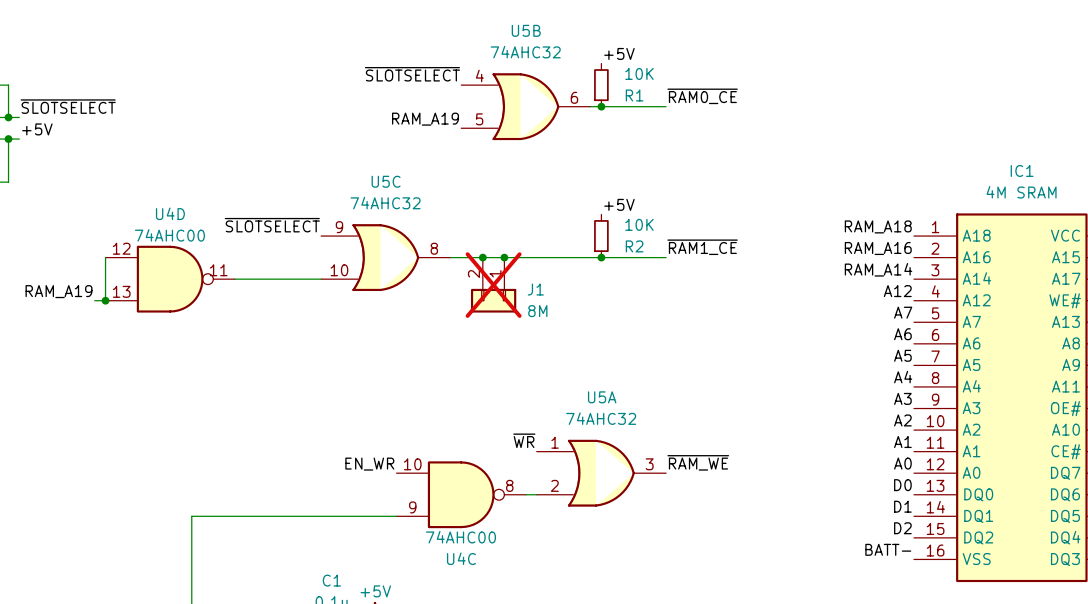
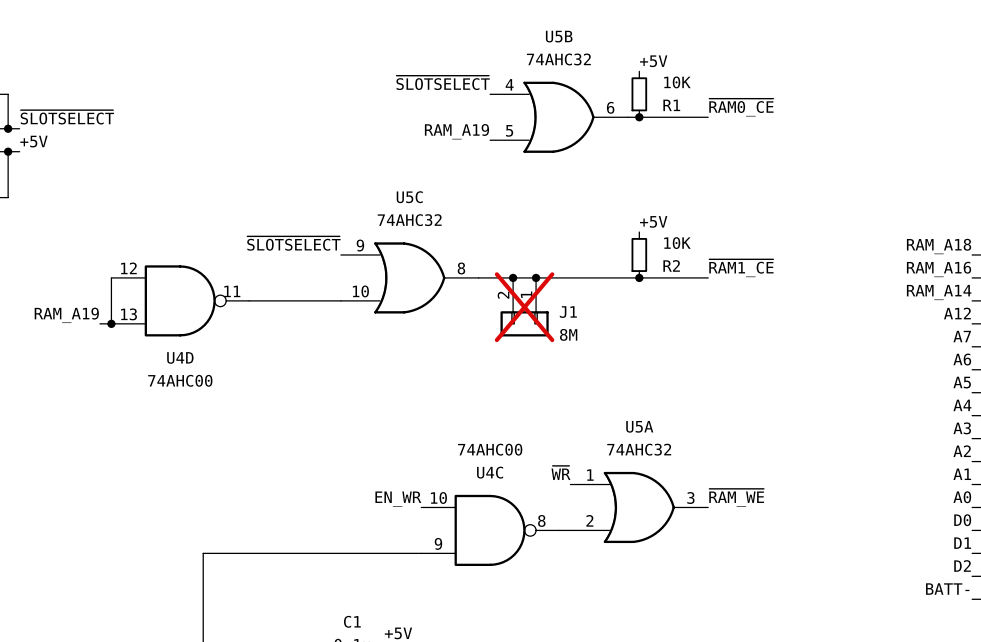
U4D name position: U4D (170, 213) -> U4D (180, 357)
U4D value position: 74AHC00 (169, 235) -> 74AHC00 (180, 380)
U4C value position: 74AHC00 (460, 537) -> 74AHC00 (490, 449)
U4C name position: U4C (461, 558) -> U4C (490, 472)

